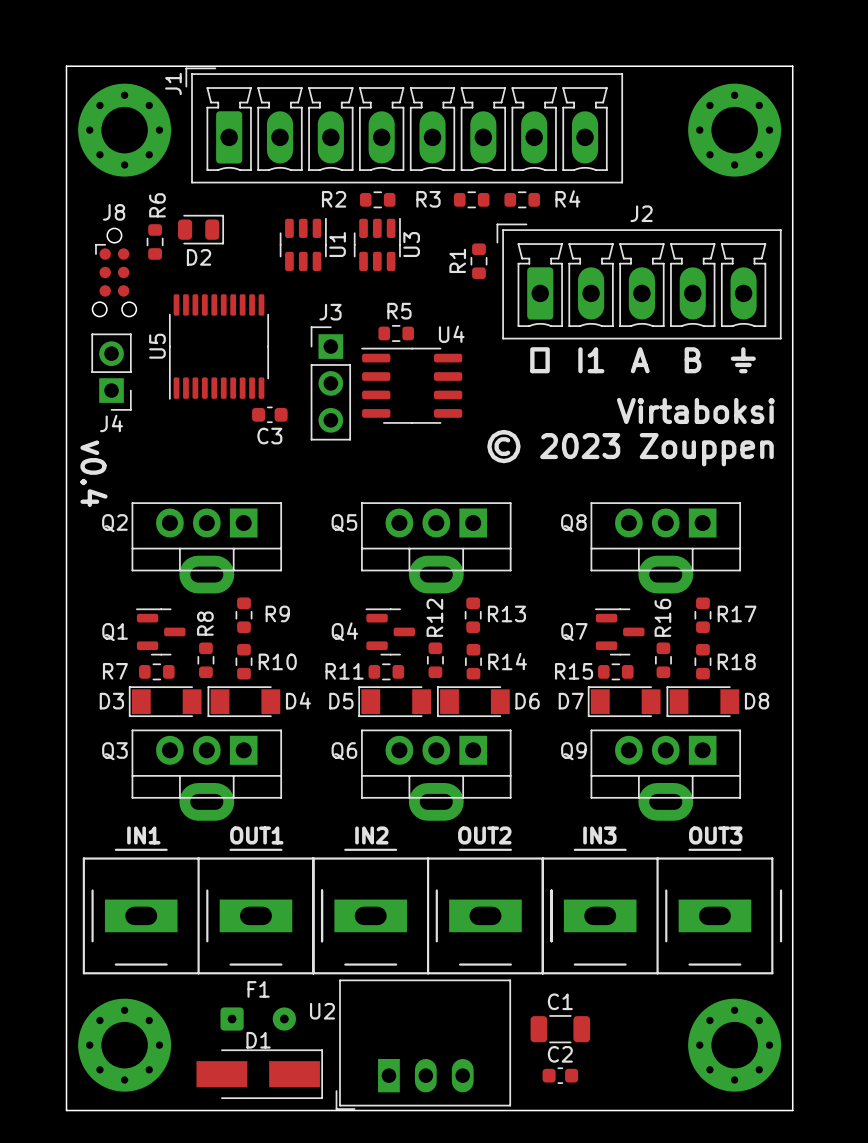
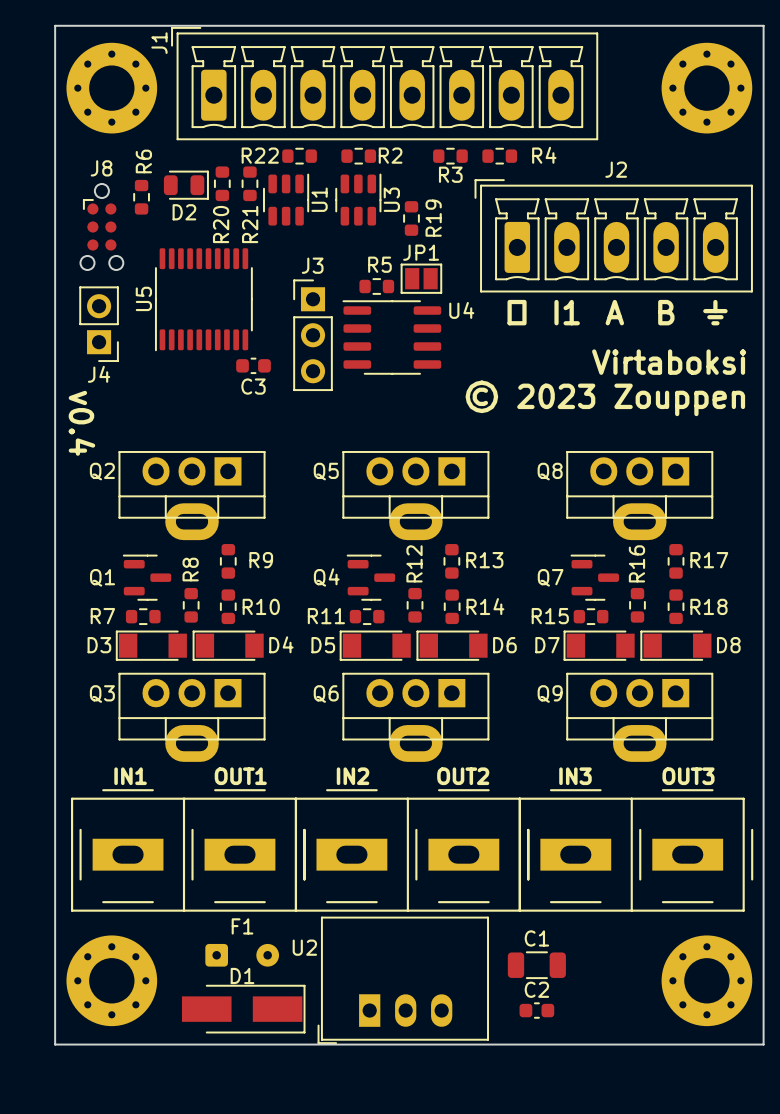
R22: none -> (299, 156)
R2 name position: R2 (334, 199) -> R2 (390, 155)
R3 name position: R3 (428, 199) -> R3 (450, 174)
R20: none -> (222, 183)
R21: none -> (249, 183)
R1: (478, 261) -> none
R19: none -> (411, 218)
JP1: none -> (421, 278)
U4 name position: U4 (451, 334) -> U4 (461, 310)

